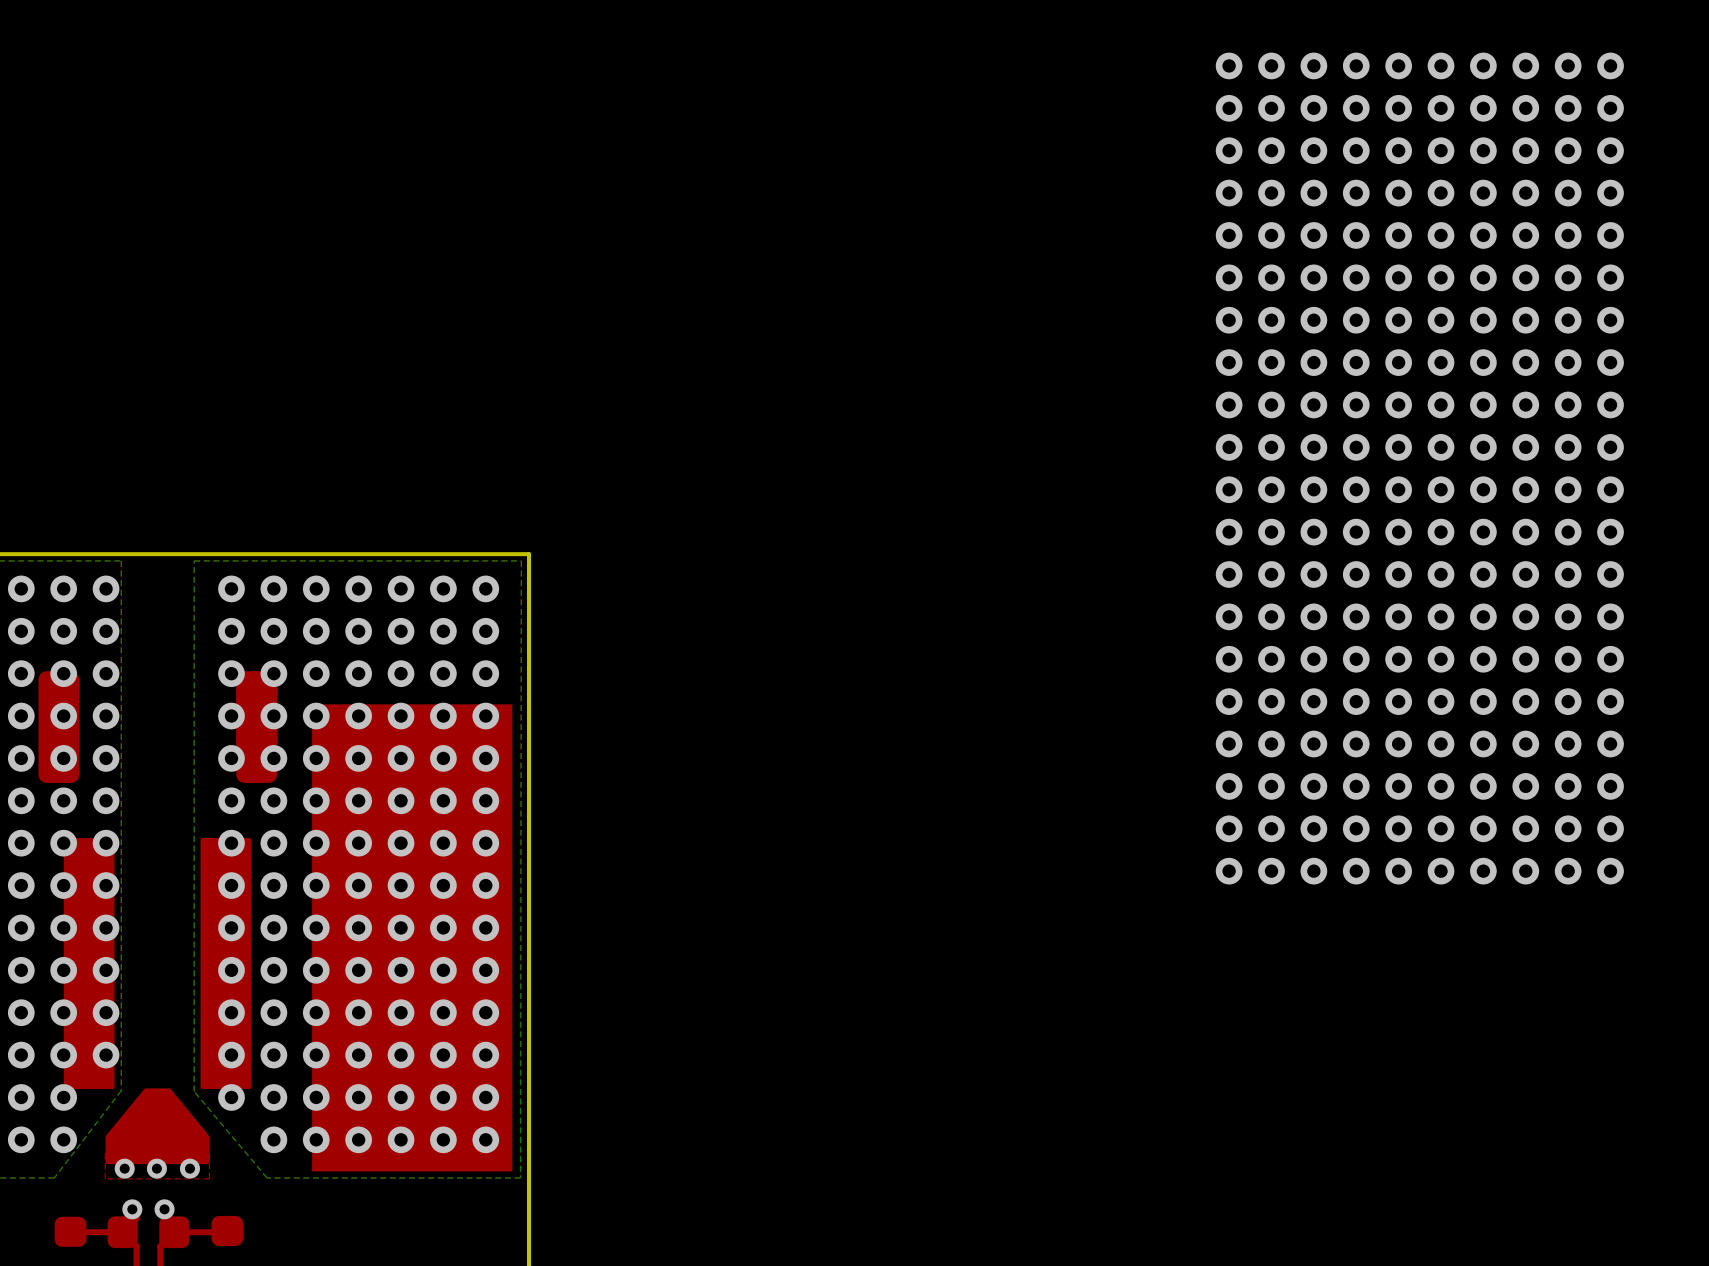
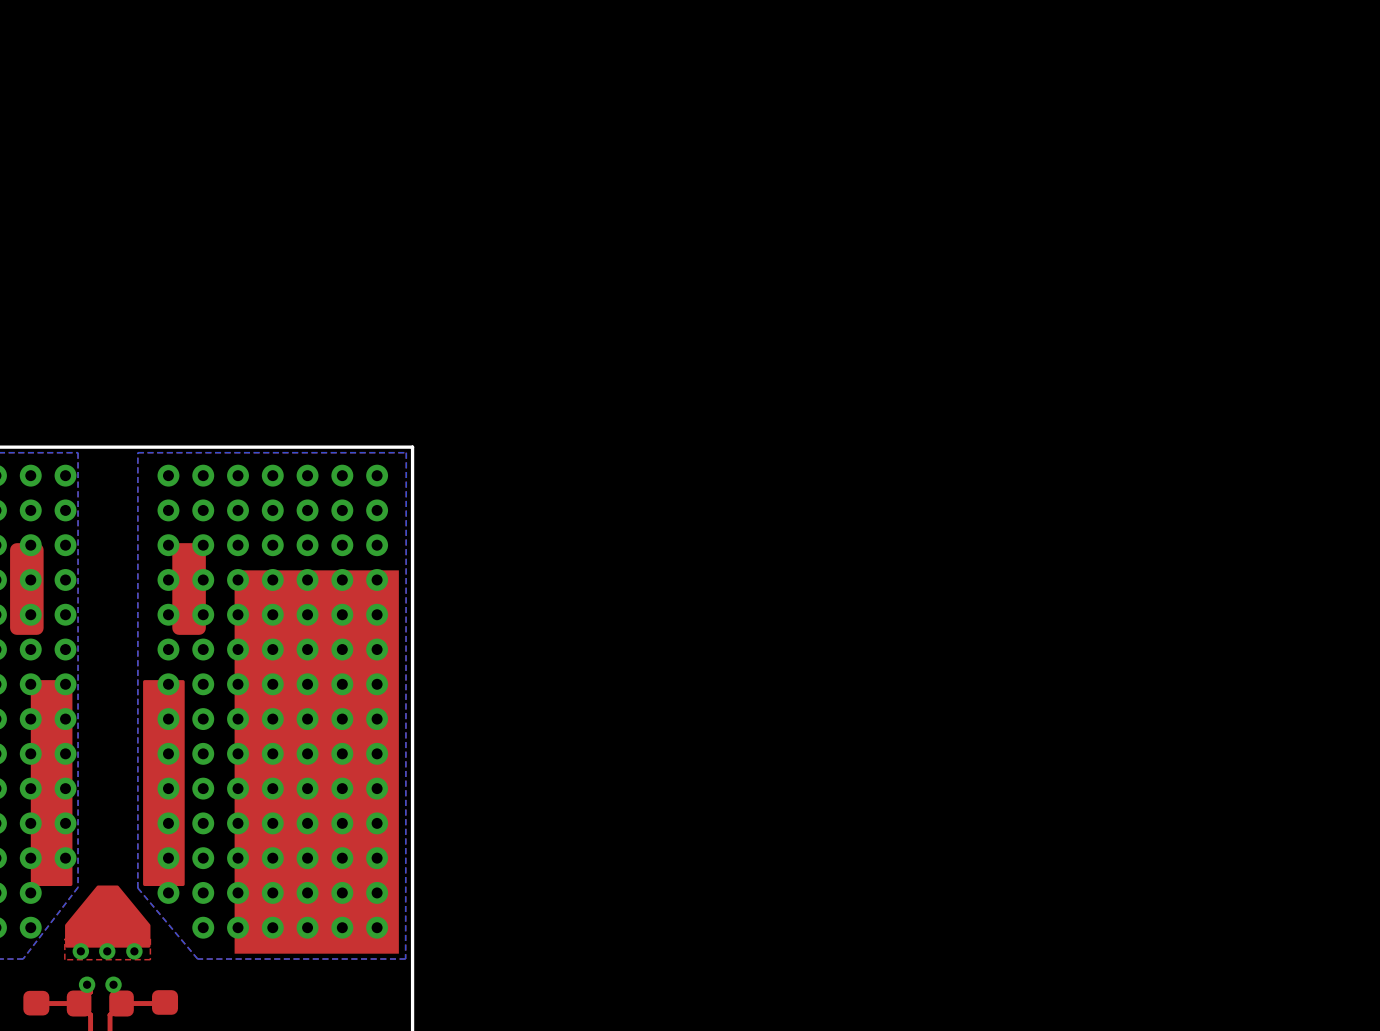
via: (1229, 65) -> none
via: (1271, 65) -> none
via: (1313, 65) -> none
via: (1356, 65) -> none
via: (1398, 65) -> none
via: (1441, 65) -> none
via: (1483, 65) -> none
via: (1525, 65) -> none
via: (1568, 65) -> none
via: (1610, 65) -> none
via: (1229, 108) -> none
via: (1271, 108) -> none
via: (1313, 108) -> none
via: (1356, 108) -> none
via: (1398, 108) -> none
via: (1441, 108) -> none
via: (1483, 108) -> none
via: (1525, 108) -> none
via: (1568, 108) -> none
via: (1610, 108) -> none
via: (1229, 150) -> none
via: (1271, 150) -> none
via: (1313, 150) -> none
via: (1356, 150) -> none
via: (1398, 150) -> none
via: (1441, 150) -> none
via: (1483, 150) -> none
via: (1525, 150) -> none
via: (1568, 150) -> none
via: (1610, 150) -> none
via: (1229, 193) -> none
via: (1271, 193) -> none
via: (1313, 193) -> none
via: (1356, 193) -> none
via: (1398, 193) -> none
via: (1441, 193) -> none
via: (1483, 193) -> none
via: (1525, 193) -> none
via: (1568, 193) -> none
via: (1610, 193) -> none
via: (1229, 235) -> none
via: (1271, 235) -> none
via: (1313, 235) -> none
via: (1356, 235) -> none
via: (1398, 235) -> none
via: (1441, 235) -> none
via: (1483, 235) -> none
via: (1525, 235) -> none
via: (1568, 235) -> none
via: (1610, 235) -> none
via: (1229, 277) -> none
via: (1271, 277) -> none
via: (1313, 277) -> none
via: (1356, 277) -> none
via: (1398, 277) -> none
via: (1441, 277) -> none
via: (1483, 277) -> none
via: (1525, 277) -> none
via: (1568, 277) -> none
via: (1610, 277) -> none
via: (1229, 320) -> none
via: (1271, 320) -> none
via: (1313, 320) -> none
via: (1356, 320) -> none
via: (1398, 320) -> none
via: (1441, 320) -> none
via: (1483, 320) -> none
via: (1525, 320) -> none
via: (1568, 320) -> none
via: (1610, 320) -> none
via: (1229, 362) -> none
via: (1271, 362) -> none
via: (1313, 362) -> none
via: (1356, 362) -> none
via: (1398, 362) -> none
via: (1441, 362) -> none
via: (1483, 362) -> none
via: (1525, 362) -> none
via: (1568, 362) -> none
via: (1610, 362) -> none
via: (1229, 404) -> none
via: (1271, 404) -> none
via: (1313, 404) -> none
via: (1356, 404) -> none
via: (1398, 404) -> none
via: (1441, 404) -> none
via: (1483, 404) -> none
via: (1525, 404) -> none
via: (1568, 404) -> none
via: (1610, 404) -> none
via: (1229, 447) -> none
via: (1271, 447) -> none
via: (1313, 447) -> none
via: (1356, 447) -> none
via: (1398, 447) -> none
via: (1441, 447) -> none
via: (1483, 447) -> none
via: (1525, 447) -> none
via: (1568, 447) -> none
via: (1610, 447) -> none
via: (1229, 489) -> none
via: (1271, 489) -> none
via: (1313, 489) -> none
via: (1356, 489) -> none
via: (1398, 489) -> none
via: (1441, 489) -> none
via: (1483, 489) -> none
via: (1525, 489) -> none
via: (1568, 489) -> none
via: (1610, 489) -> none
via: (1229, 532) -> none
via: (1271, 532) -> none
via: (1313, 532) -> none
via: (1356, 532) -> none
via: (1398, 532) -> none
via: (1441, 532) -> none
via: (1483, 532) -> none
via: (1525, 532) -> none
via: (1568, 532) -> none
via: (1610, 532) -> none
via: (1229, 574) -> none
via: (1271, 574) -> none
via: (1313, 574) -> none
via: (1356, 574) -> none
via: (1398, 574) -> none
via: (1441, 574) -> none
via: (1483, 574) -> none
via: (1525, 574) -> none
via: (1568, 574) -> none
via: (1610, 574) -> none
via: (1229, 616) -> none
via: (1271, 616) -> none
via: (1313, 616) -> none
via: (1356, 616) -> none
via: (1398, 616) -> none
via: (1441, 616) -> none
via: (1483, 616) -> none
via: (1525, 616) -> none
via: (1568, 616) -> none
via: (1610, 616) -> none
via: (1229, 659) -> none
via: (1271, 659) -> none
via: (1313, 659) -> none
via: (1356, 659) -> none
via: (1398, 659) -> none
via: (1441, 659) -> none
via: (1483, 659) -> none
via: (1525, 659) -> none
via: (1568, 659) -> none
via: (1610, 659) -> none
via: (1229, 701) -> none
via: (1271, 701) -> none
via: (1313, 701) -> none
via: (1356, 701) -> none
via: (1398, 701) -> none
via: (1441, 701) -> none
via: (1483, 701) -> none
via: (1525, 701) -> none
via: (1568, 701) -> none
via: (1610, 701) -> none
via: (1229, 744) -> none
via: (1271, 744) -> none
via: (1313, 744) -> none
via: (1356, 744) -> none
via: (1398, 744) -> none
via: (1441, 744) -> none
via: (1483, 744) -> none
via: (1525, 744) -> none
via: (1568, 744) -> none
via: (1610, 744) -> none
via: (1229, 786) -> none
via: (1271, 786) -> none
via: (1313, 786) -> none
via: (1356, 786) -> none
via: (1398, 786) -> none
via: (1441, 786) -> none
via: (1483, 786) -> none
via: (1525, 786) -> none
via: (1568, 786) -> none
via: (1610, 786) -> none
via: (1229, 828) -> none
via: (1271, 828) -> none
via: (1313, 828) -> none
via: (1356, 828) -> none
via: (1398, 828) -> none
via: (1441, 828) -> none
via: (1483, 828) -> none
via: (1525, 828) -> none
via: (1568, 828) -> none
via: (1610, 828) -> none
via: (1229, 871) -> none
via: (1271, 871) -> none
via: (1313, 871) -> none
via: (1356, 871) -> none
via: (1398, 871) -> none
via: (1441, 871) -> none
via: (1483, 871) -> none
via: (1525, 871) -> none
via: (1568, 871) -> none
via: (1610, 871) -> none

